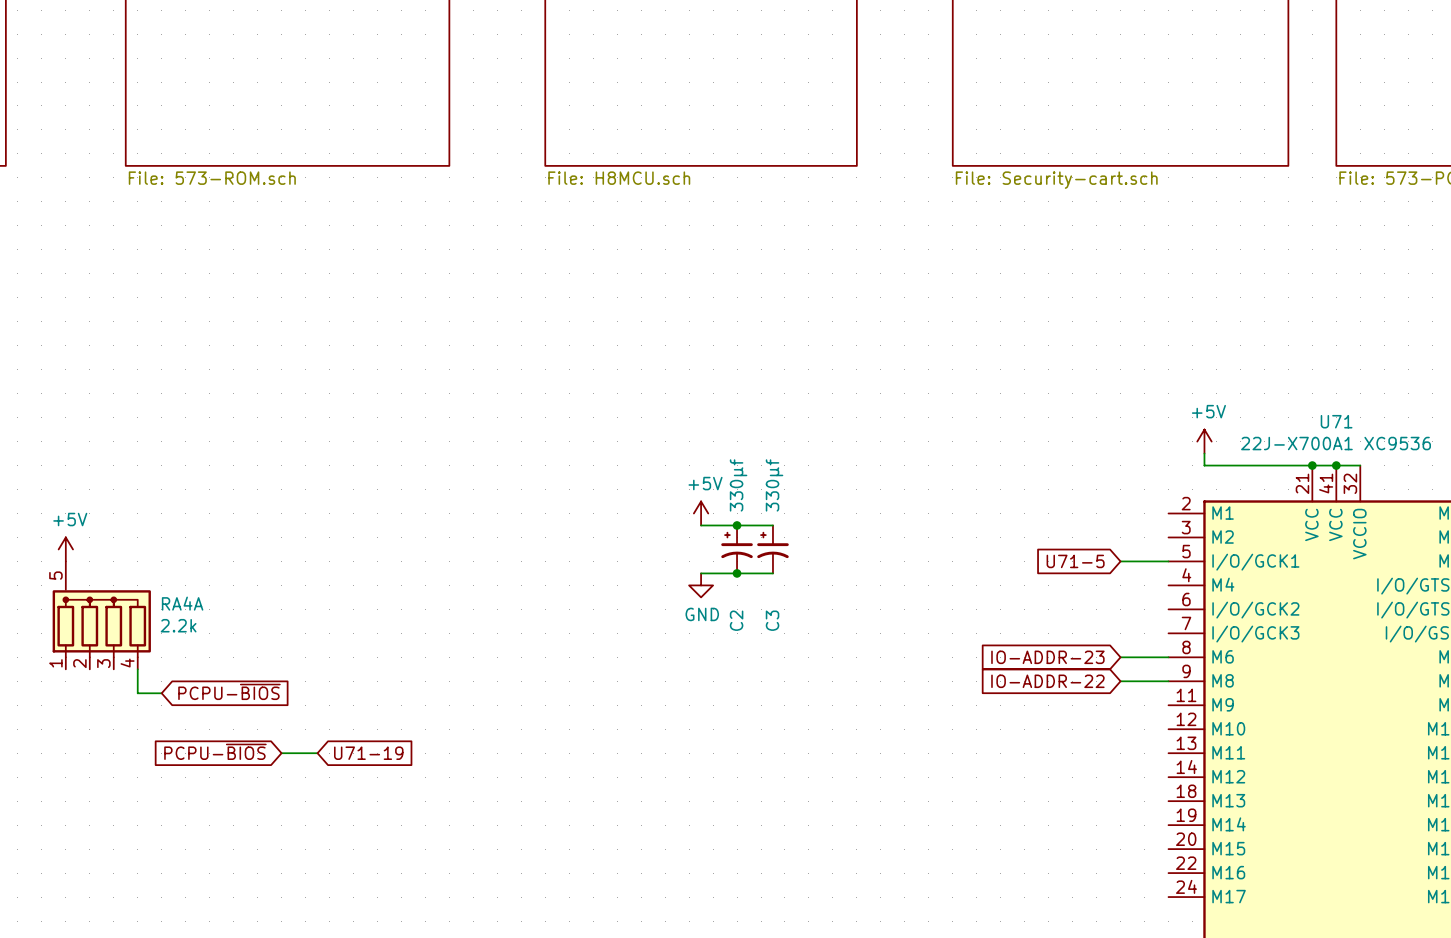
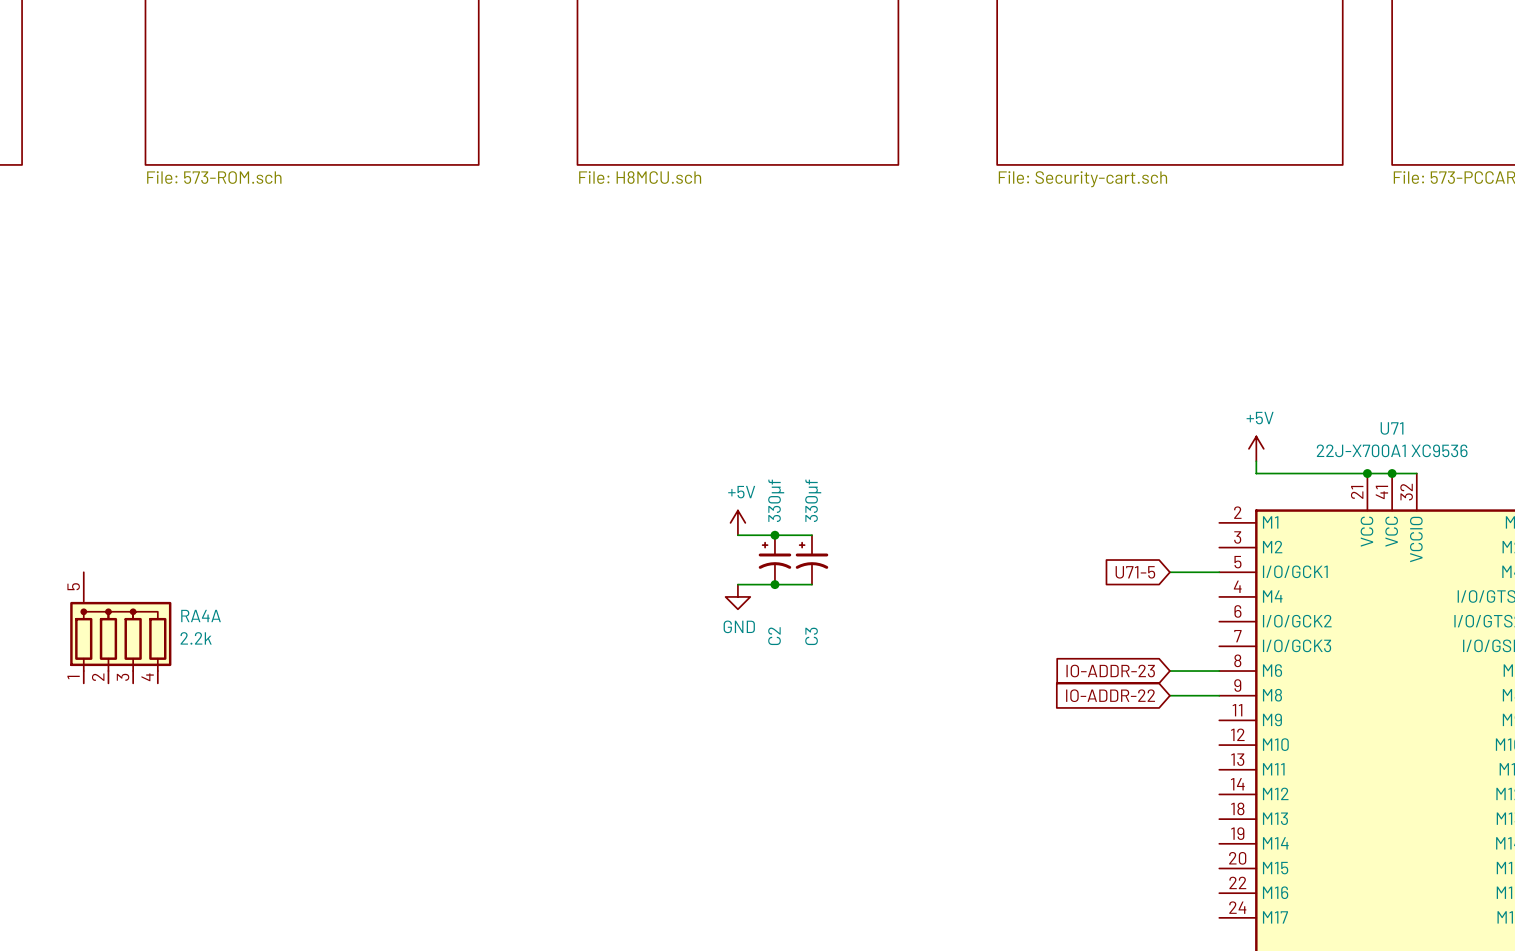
power symbol: +5V (65, 549) -> none
wire: (137, 669) (137, 693) (161, 693) -> none
global label: PCPU-~{BIOS} (229, 691) -> none
global label: PCPU-~{BIOS} (215, 751) -> none
wire: (281, 753) (317, 753) -> none
global label: U71-19 (368, 753) -> none

